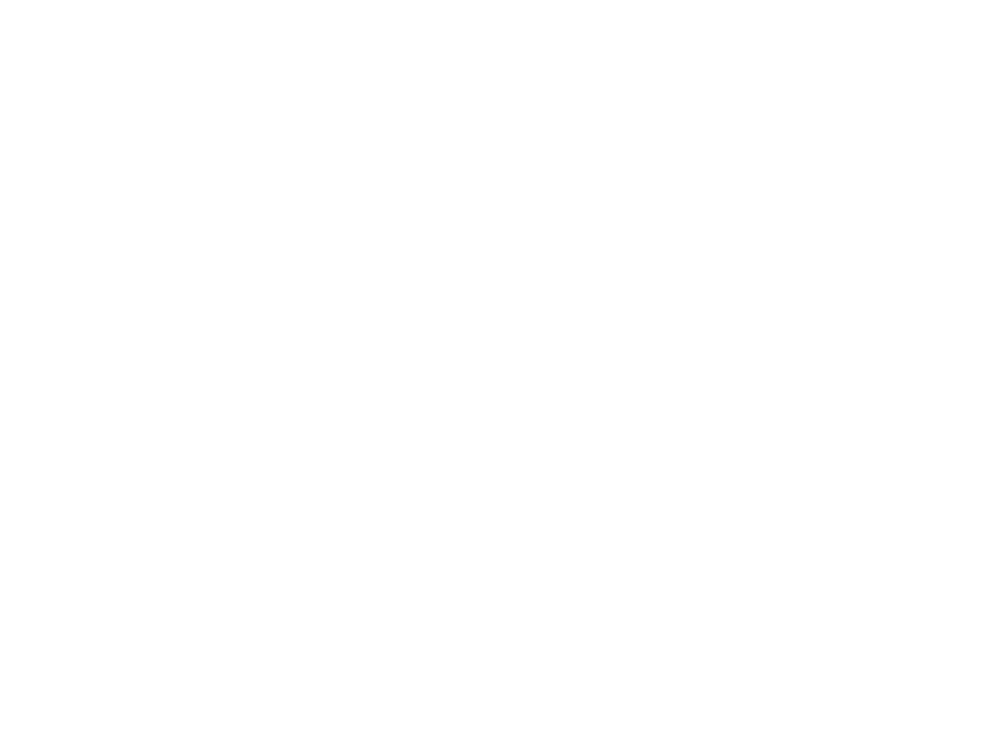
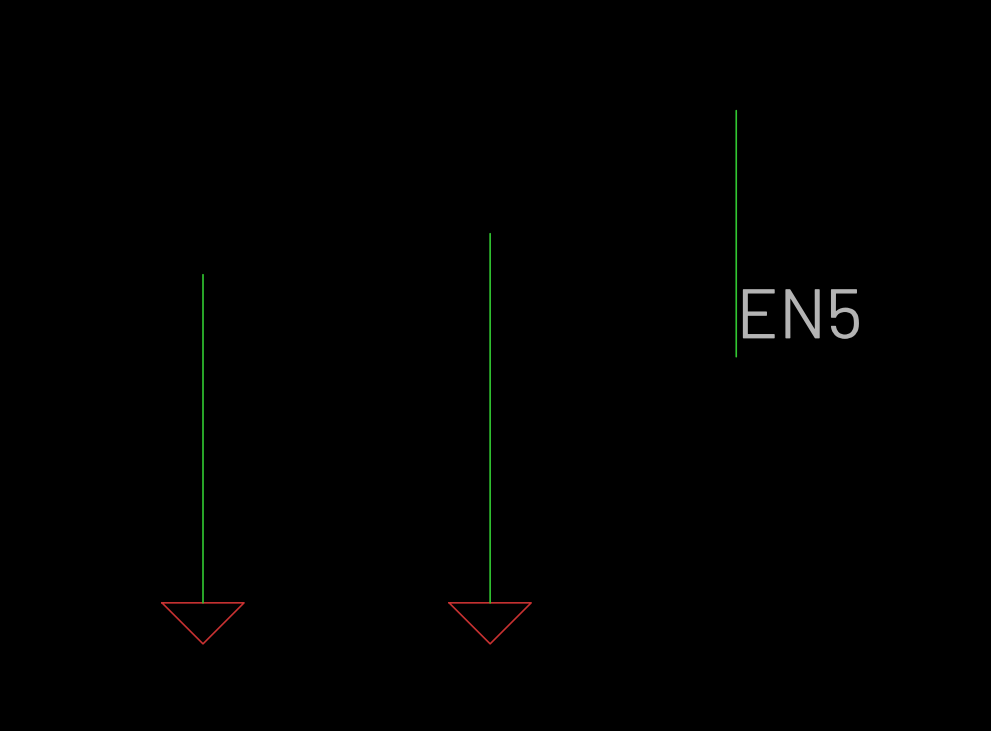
wire: none -> (736, 110) (736, 356)
wire: none -> (490, 233) (490, 602)
wire: none -> (203, 274) (203, 602)
label: none -> EN5 (800, 314)
power symbol: none -> (203, 623)
power symbol: none -> (490, 623)

